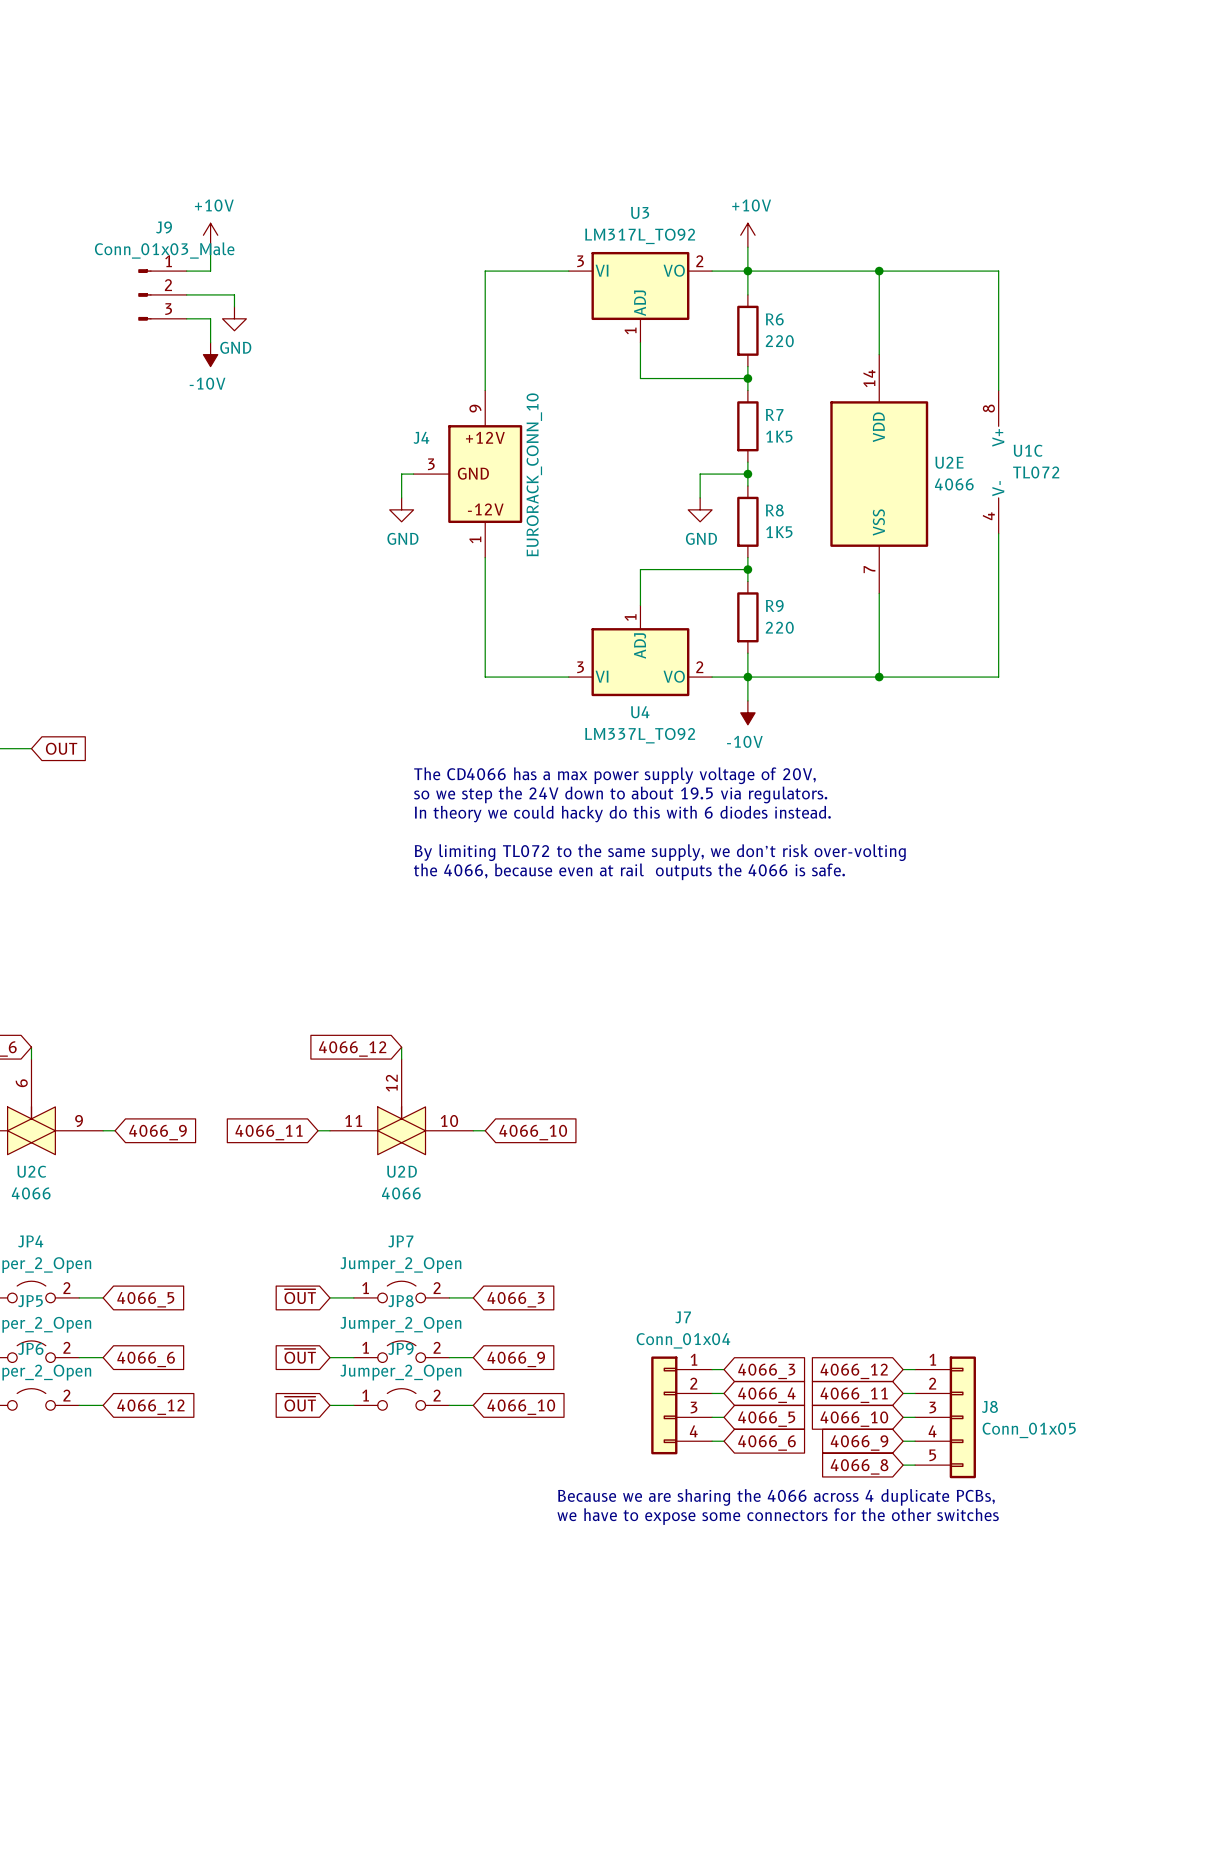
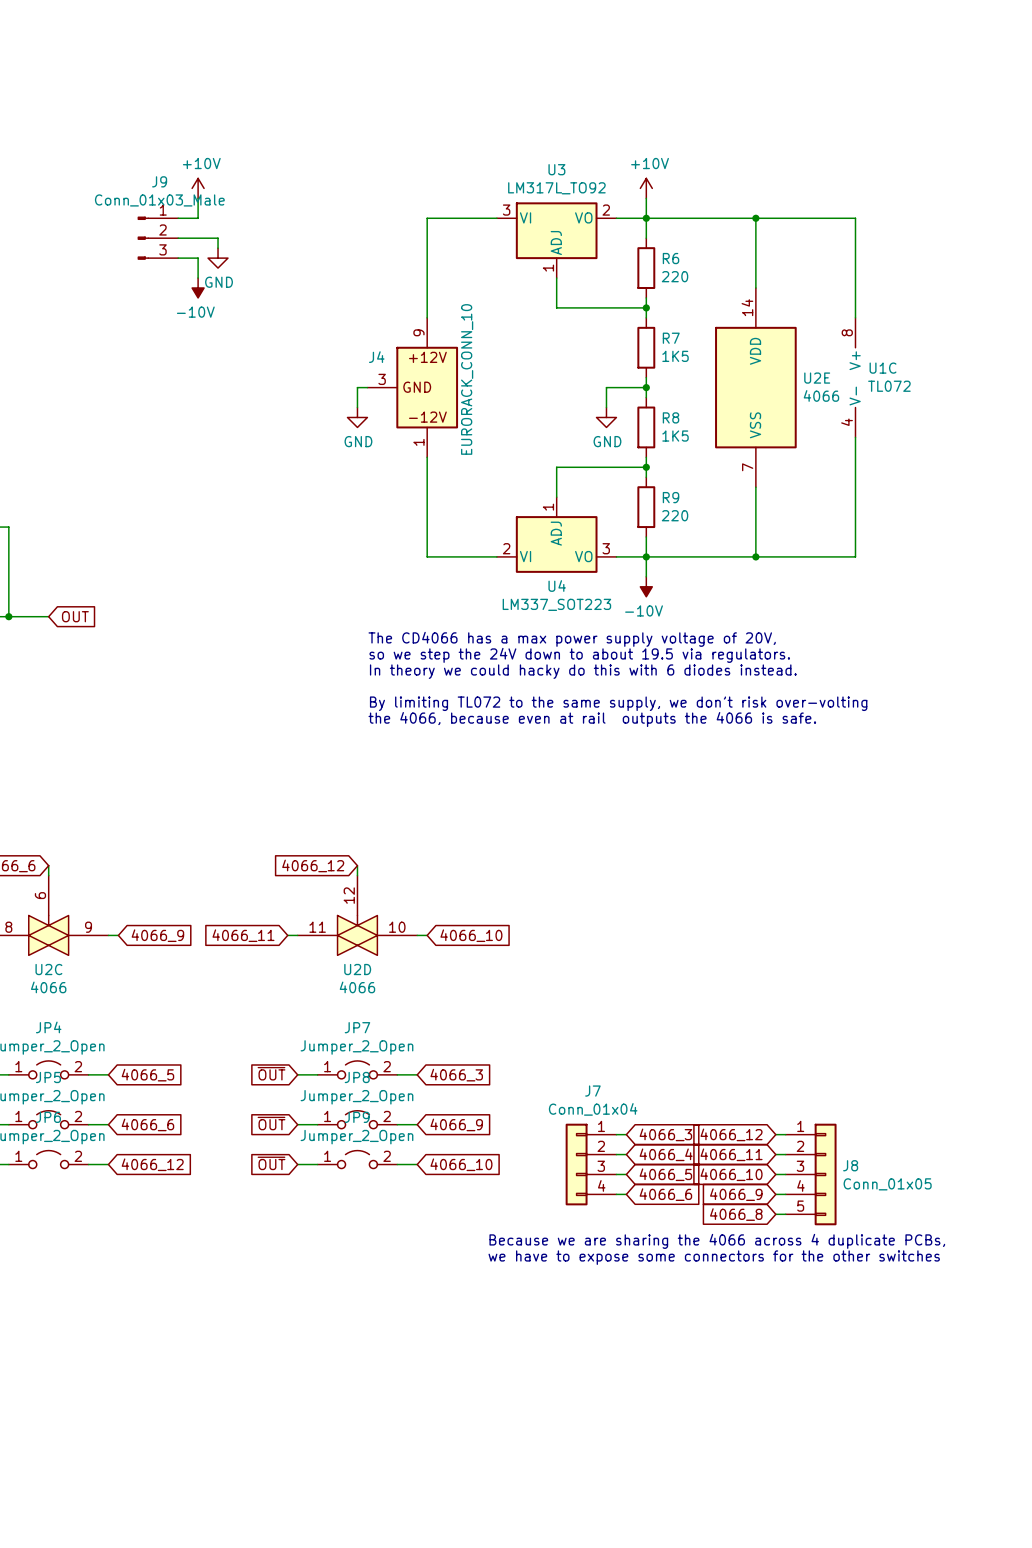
U4 pin number: 3 (580, 667) -> 2 (506, 548)
U4 pin number: 2 (699, 667) -> 3 (606, 548)
U4 value: LM337L_TO92 (640, 735) -> LM337_SOT223 (556, 604)

